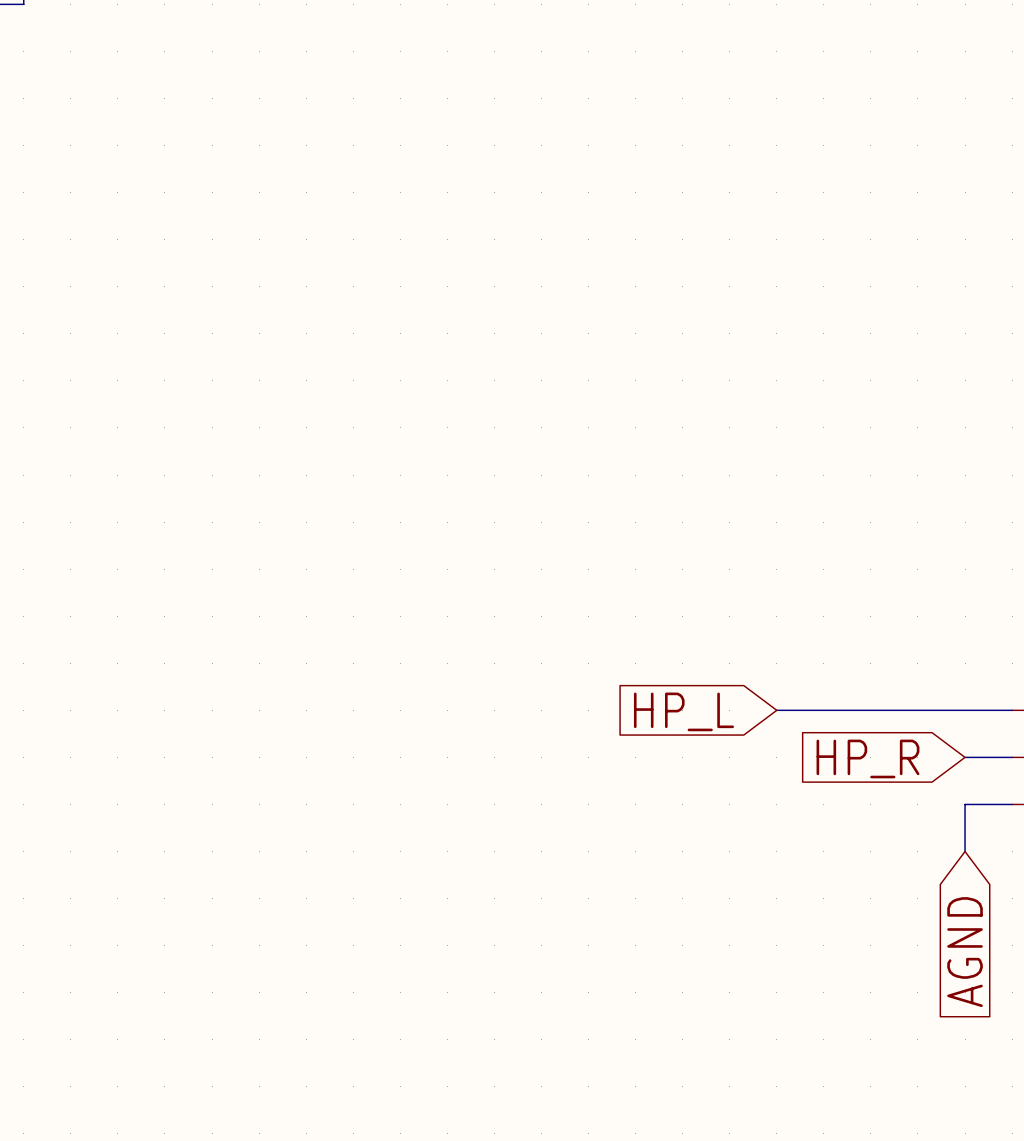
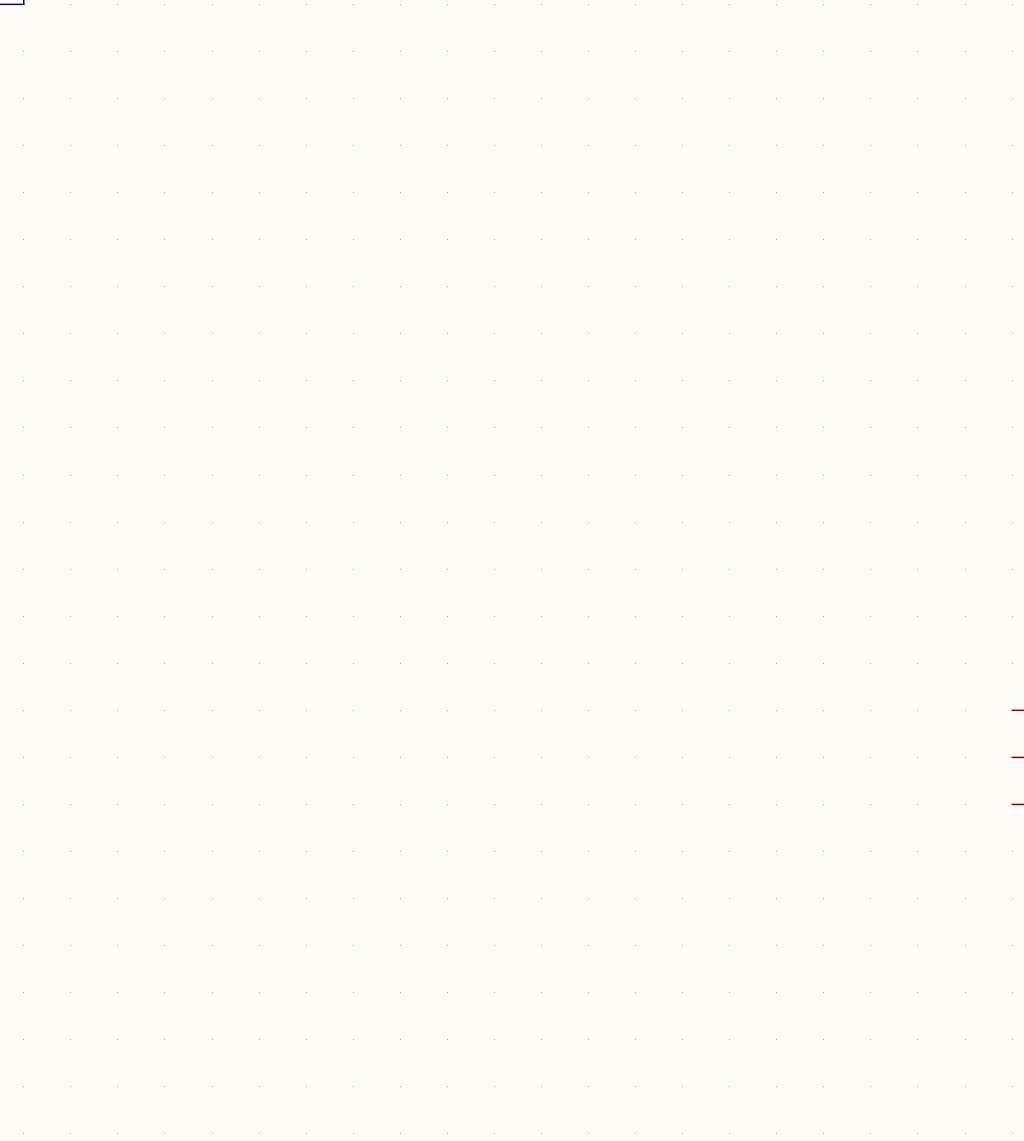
wire: (776, 710) (1012, 710) -> none
global label: HP_L (683, 711) -> none
wire: (965, 757) (1012, 757) -> none
global label: HP_R (867, 758) -> none
wire: (1012, 804) (965, 804) (965, 851) -> none
global label: AGND (965, 952) -> none

